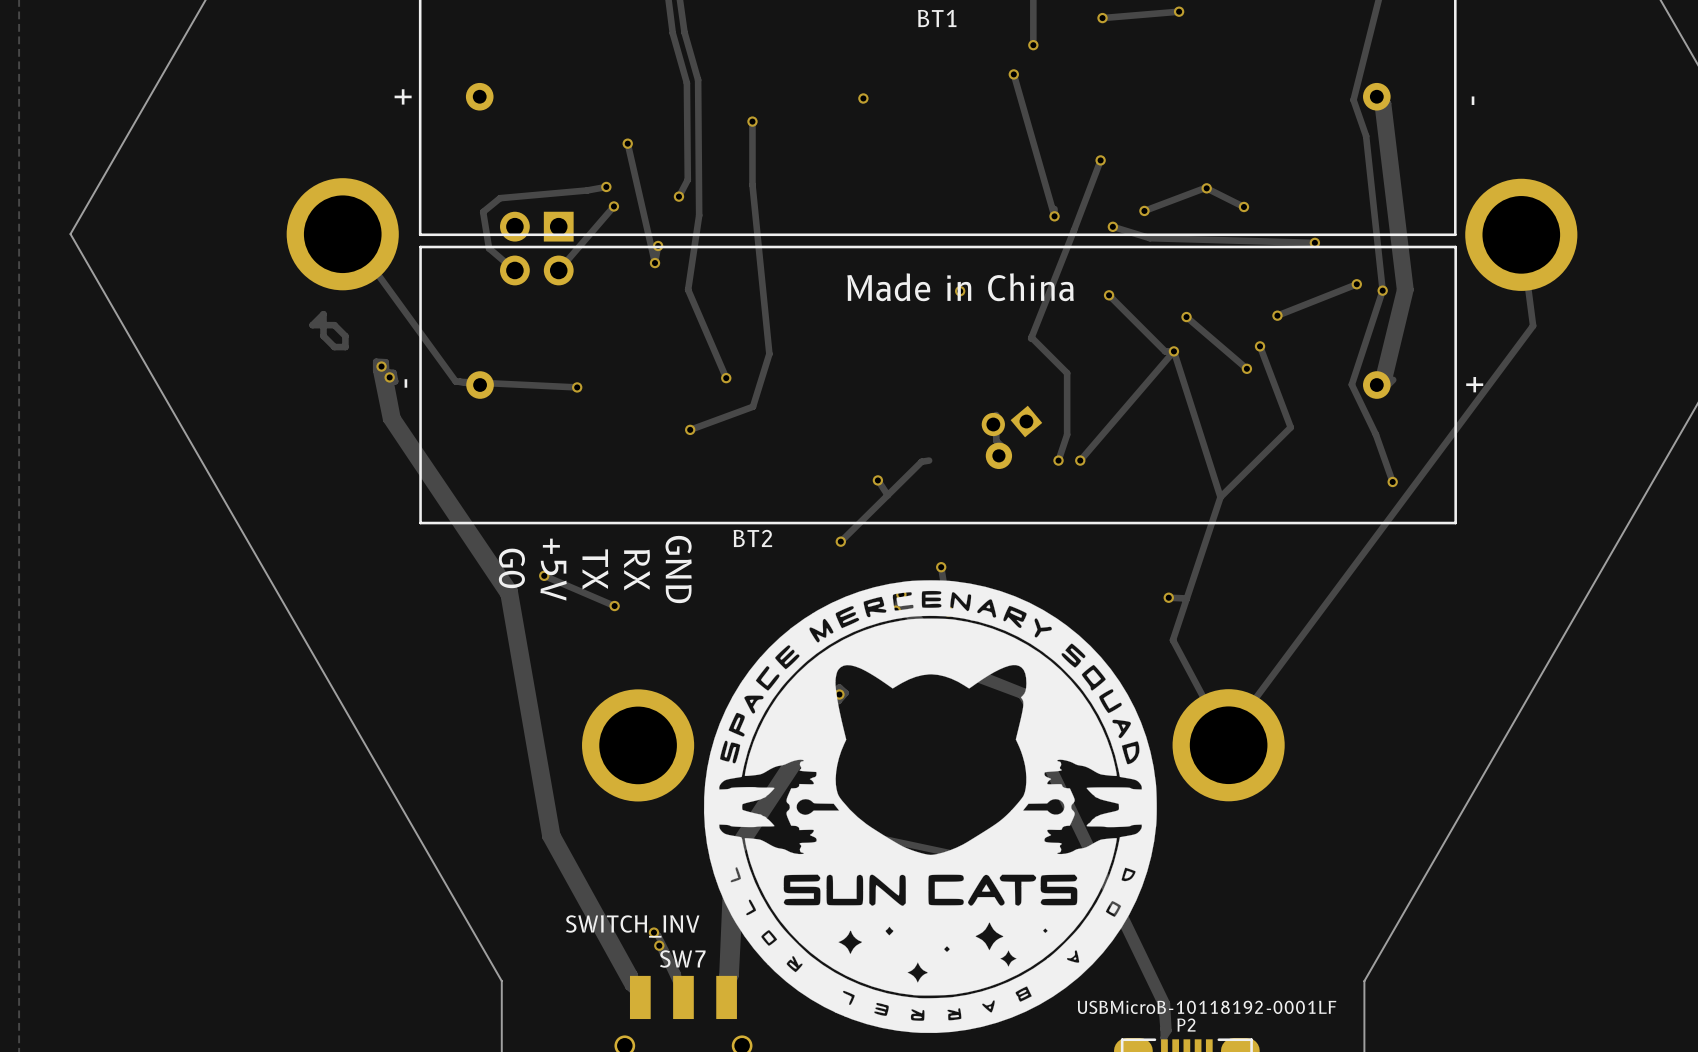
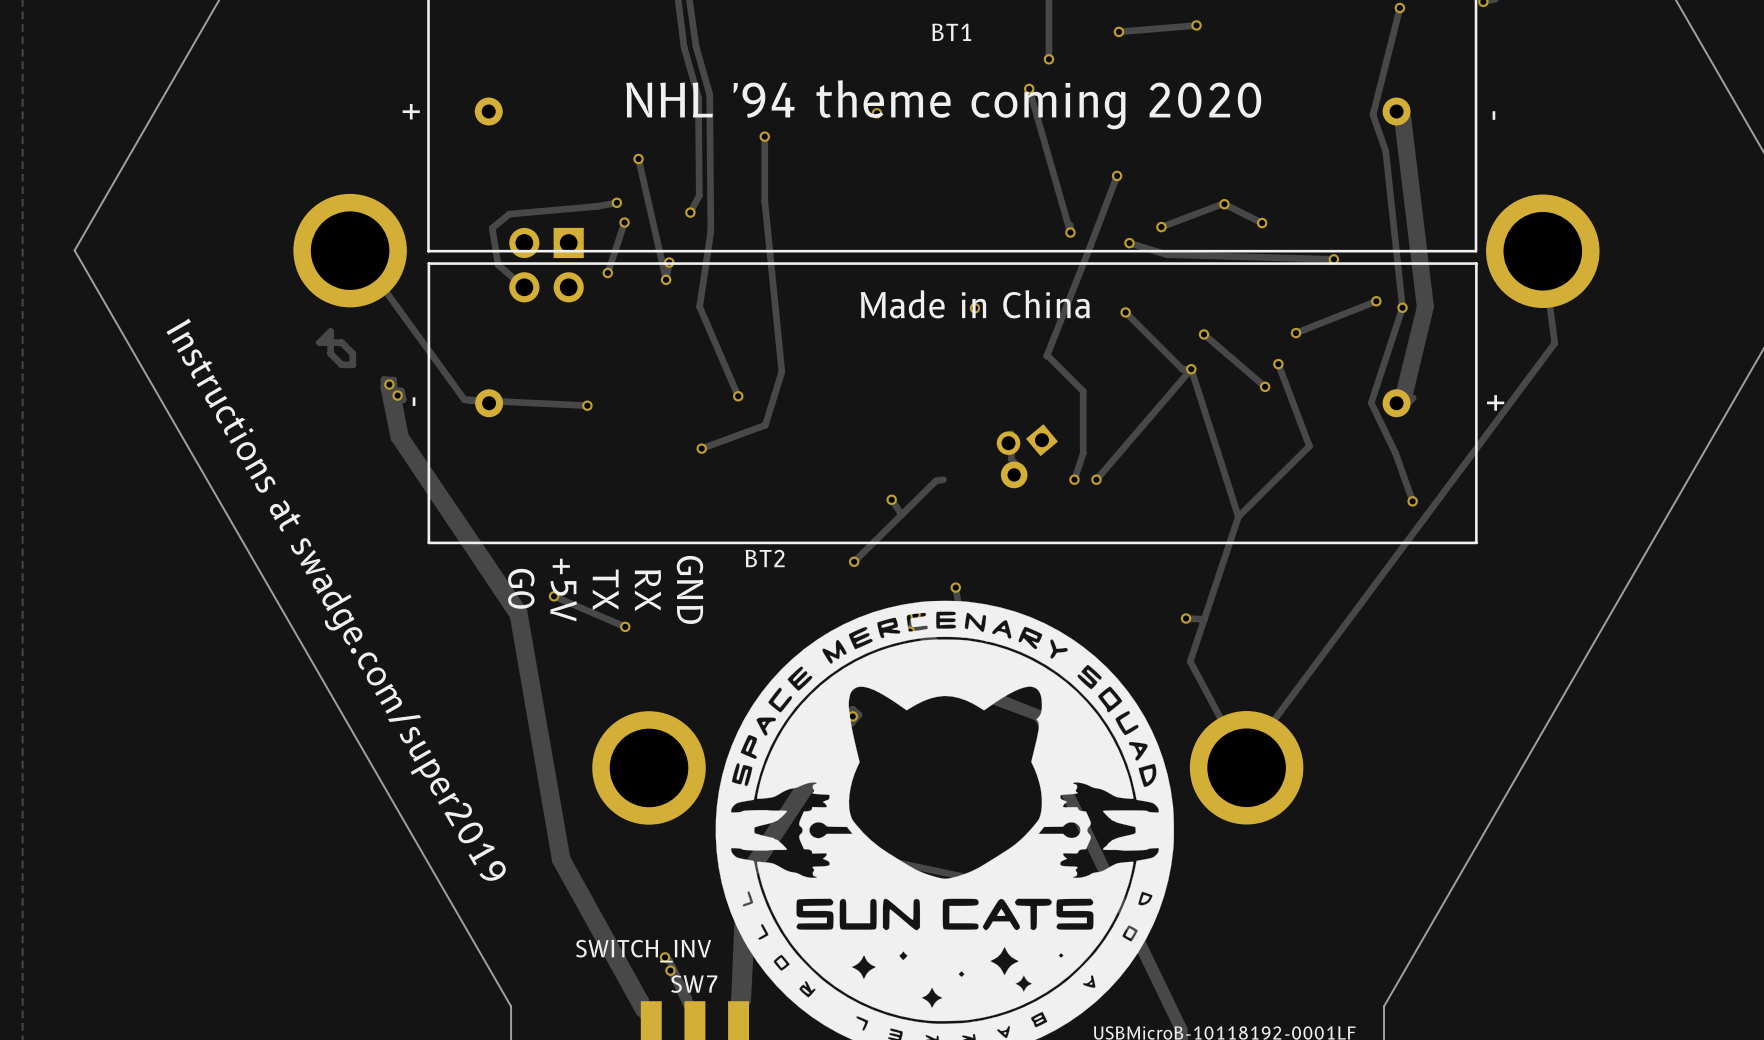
text: none -> NHL '94 theme coming 2020 (943, 104)
track: (613, 206) (558, 270) -> (624, 222) (607, 273)
via: none -> (607, 273)
text: none -> Instructions at swadge.com/super2019 (336, 599)

